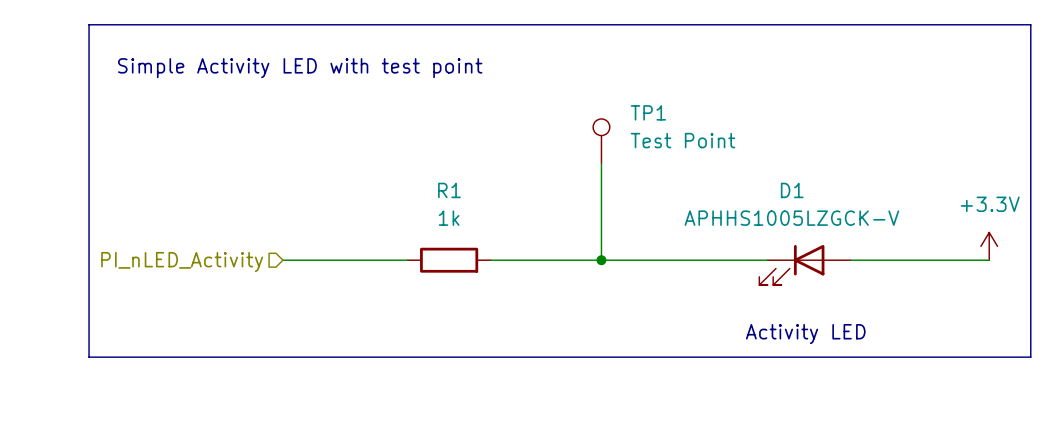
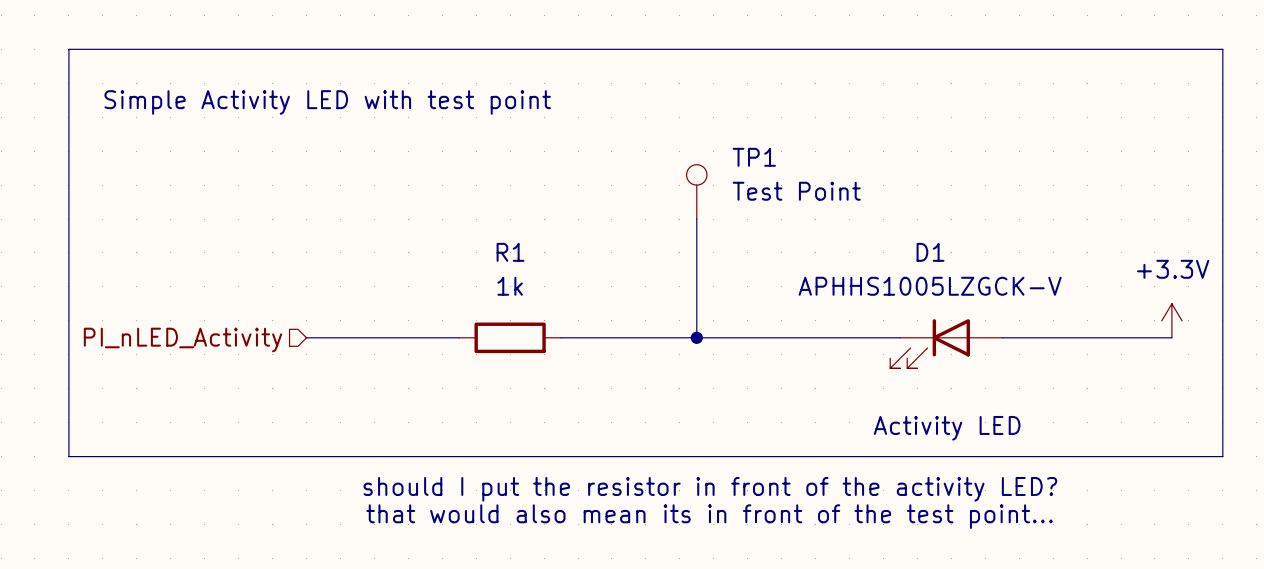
text: none -> should I put the resistor in front of the activity LED? (710, 489)
text: none -> that would also mean its in front of the test point... (709, 516)

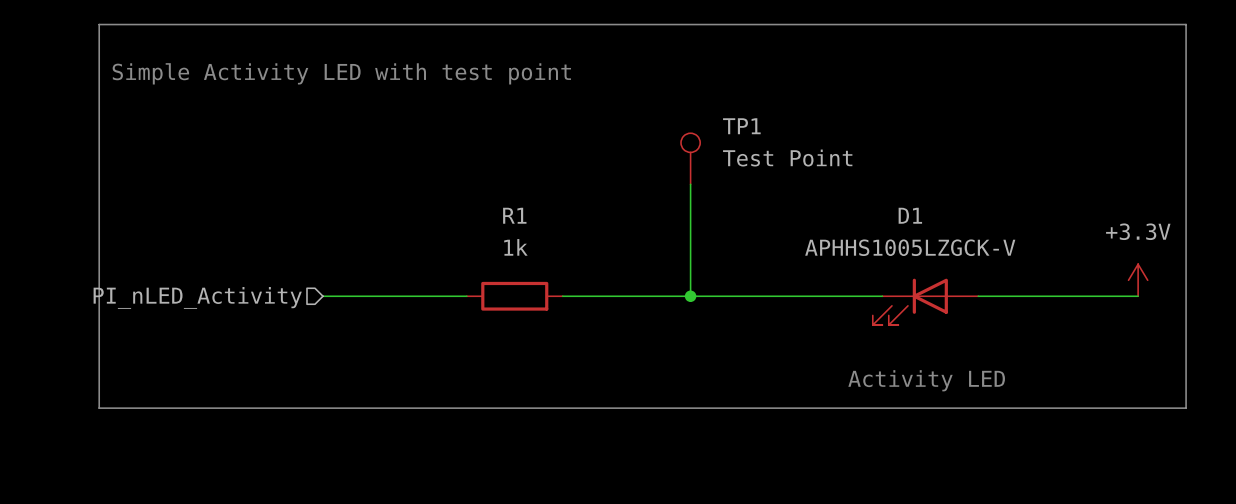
text: should I put the resistor in front of the activity LED? (710, 489) -> none
text: that would also mean its in front of the test point... (709, 516) -> none

